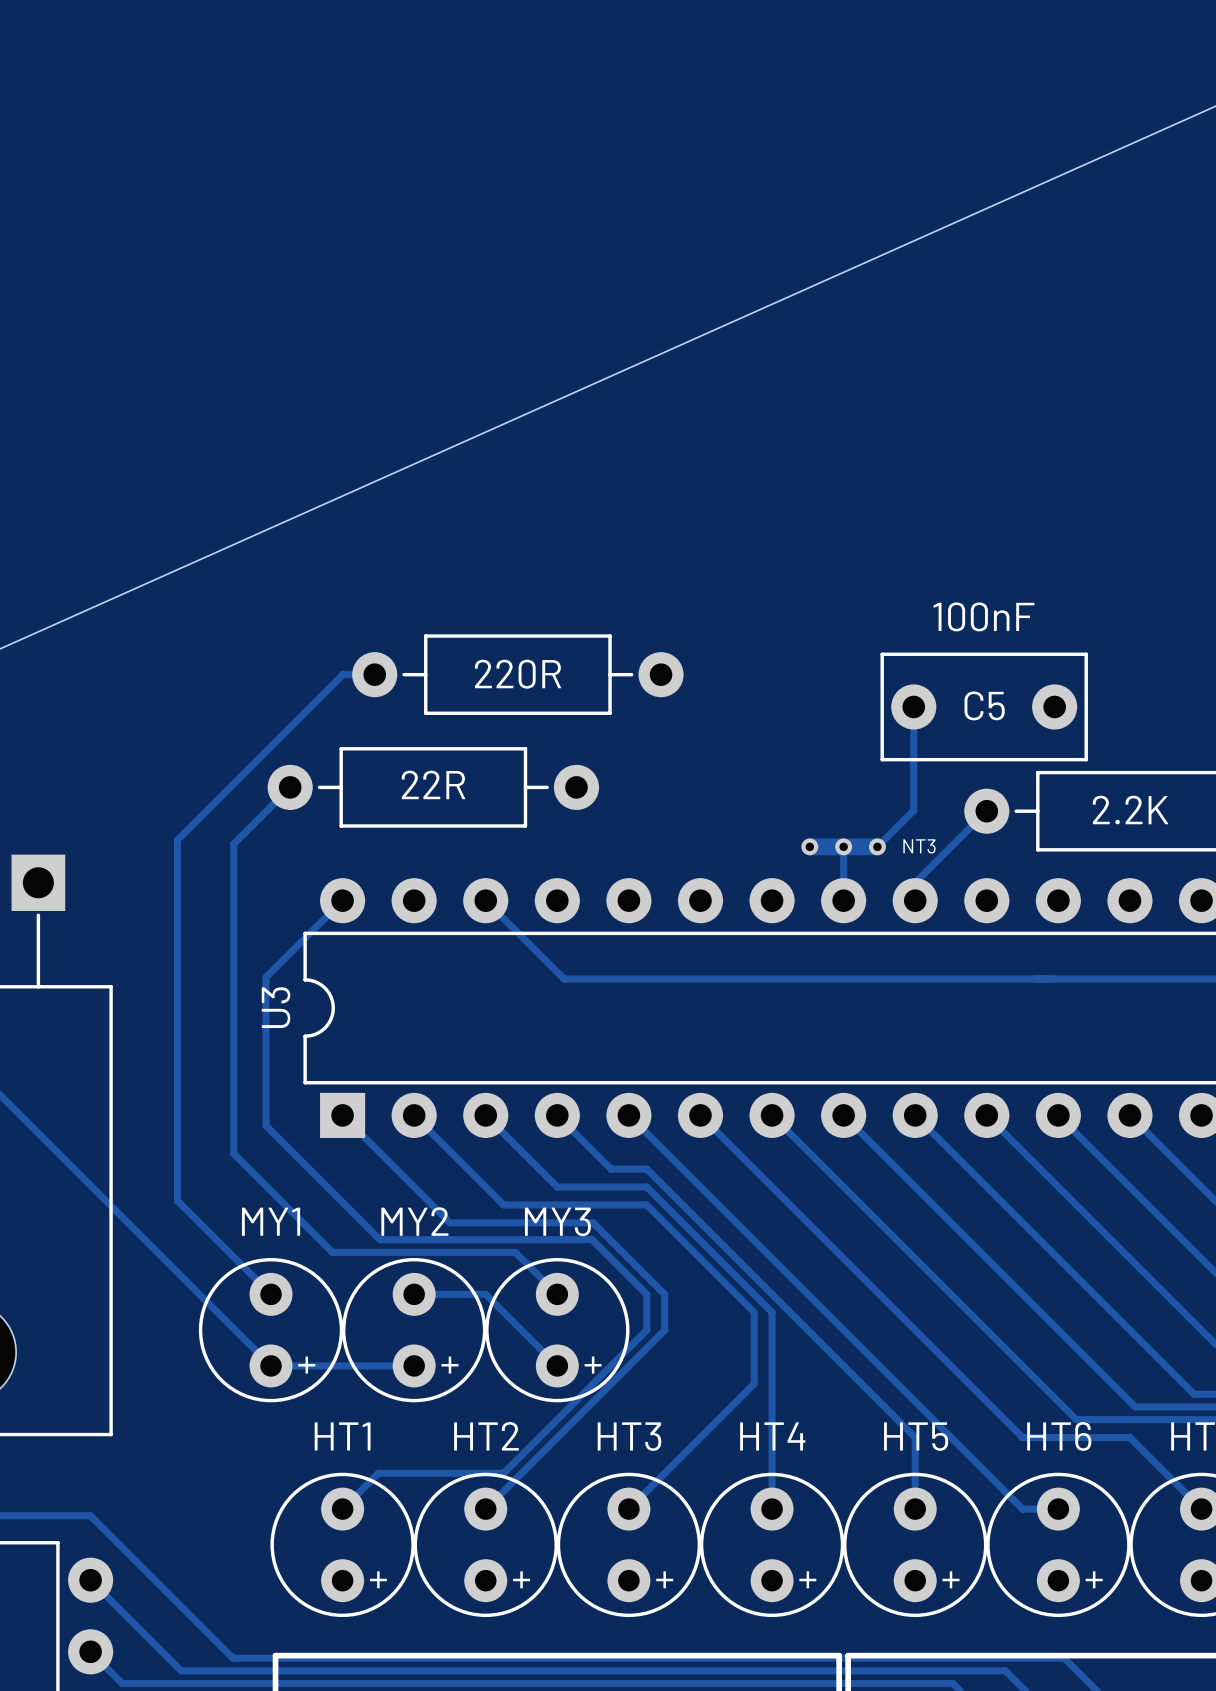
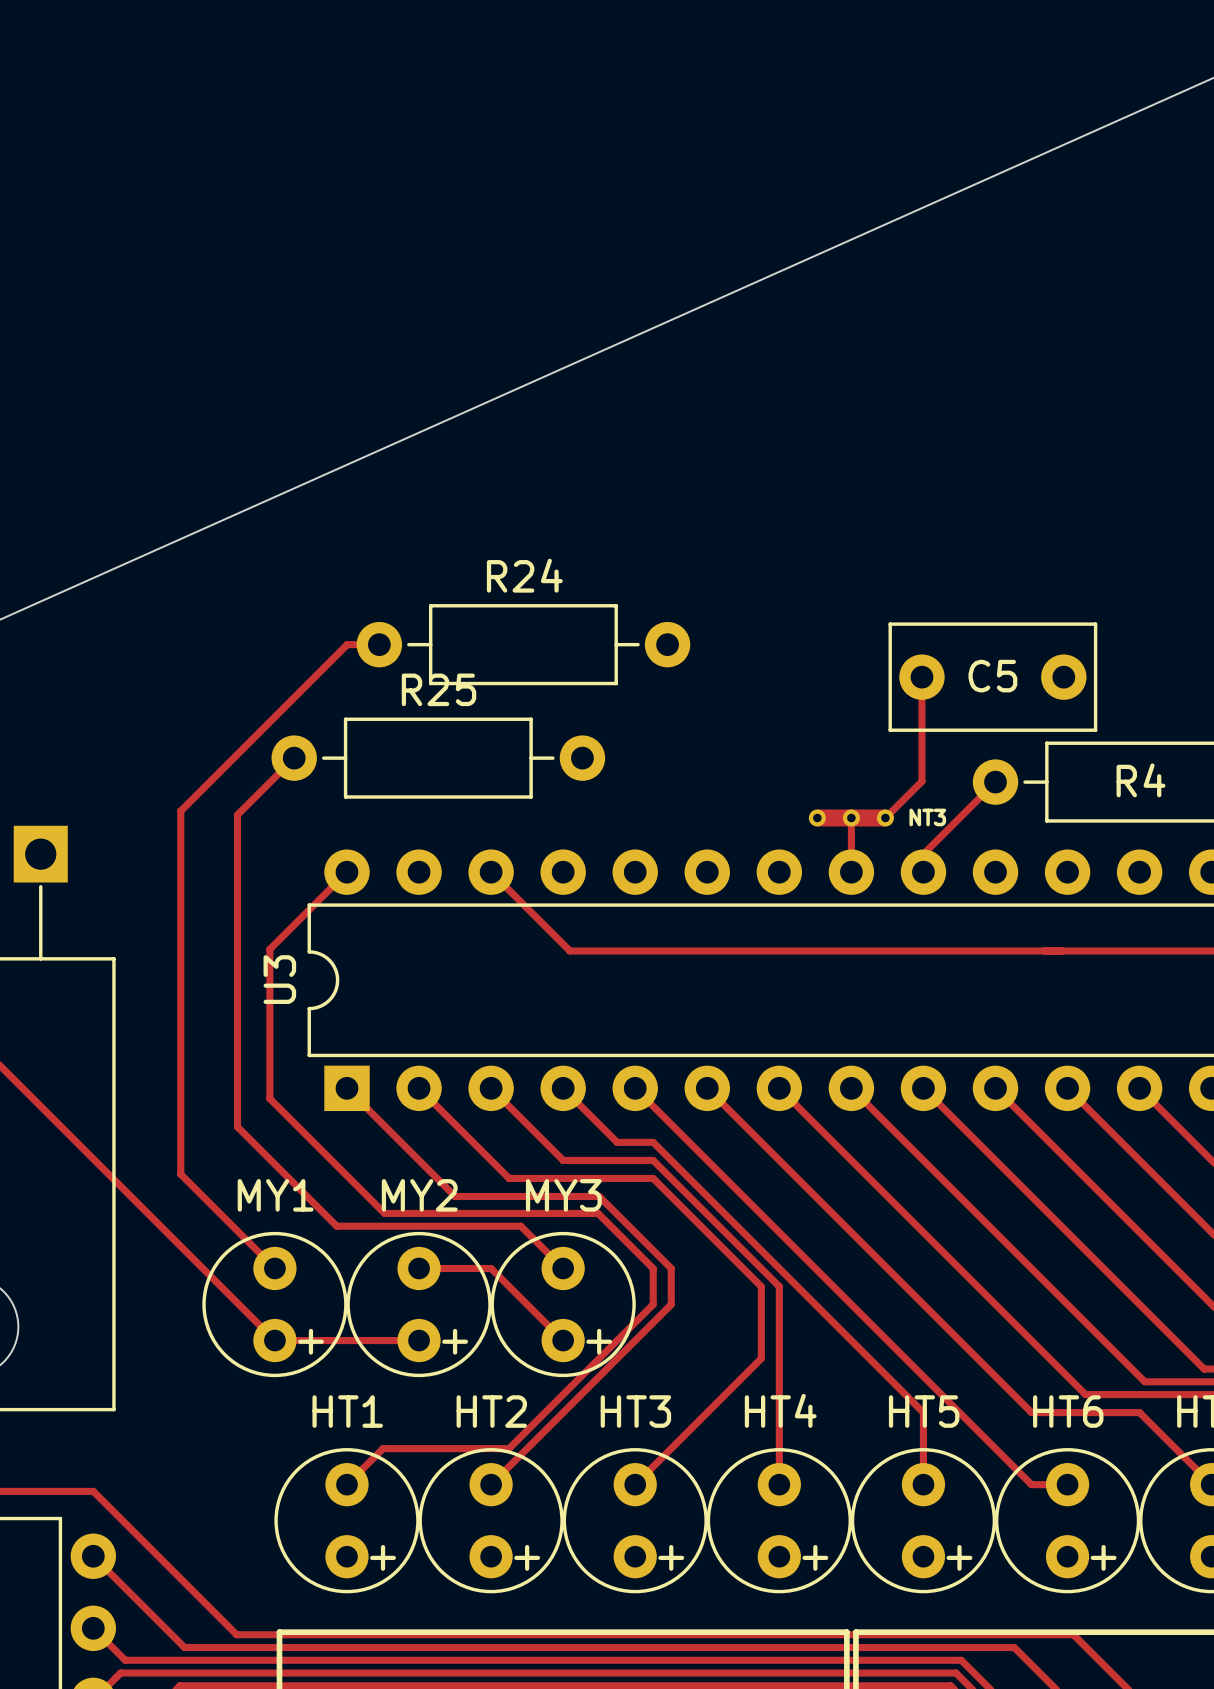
R24 name: none -> R24 (524, 575)
C5 value: 100nF (983, 616) -> none
R24 value: 220R (518, 674) -> none
R25 name: none -> R25 (439, 689)
R25 value: 22R (433, 784) -> none
R4 name: none -> R4 (1140, 780)
R4 value: 2.2K (1130, 810) -> none

